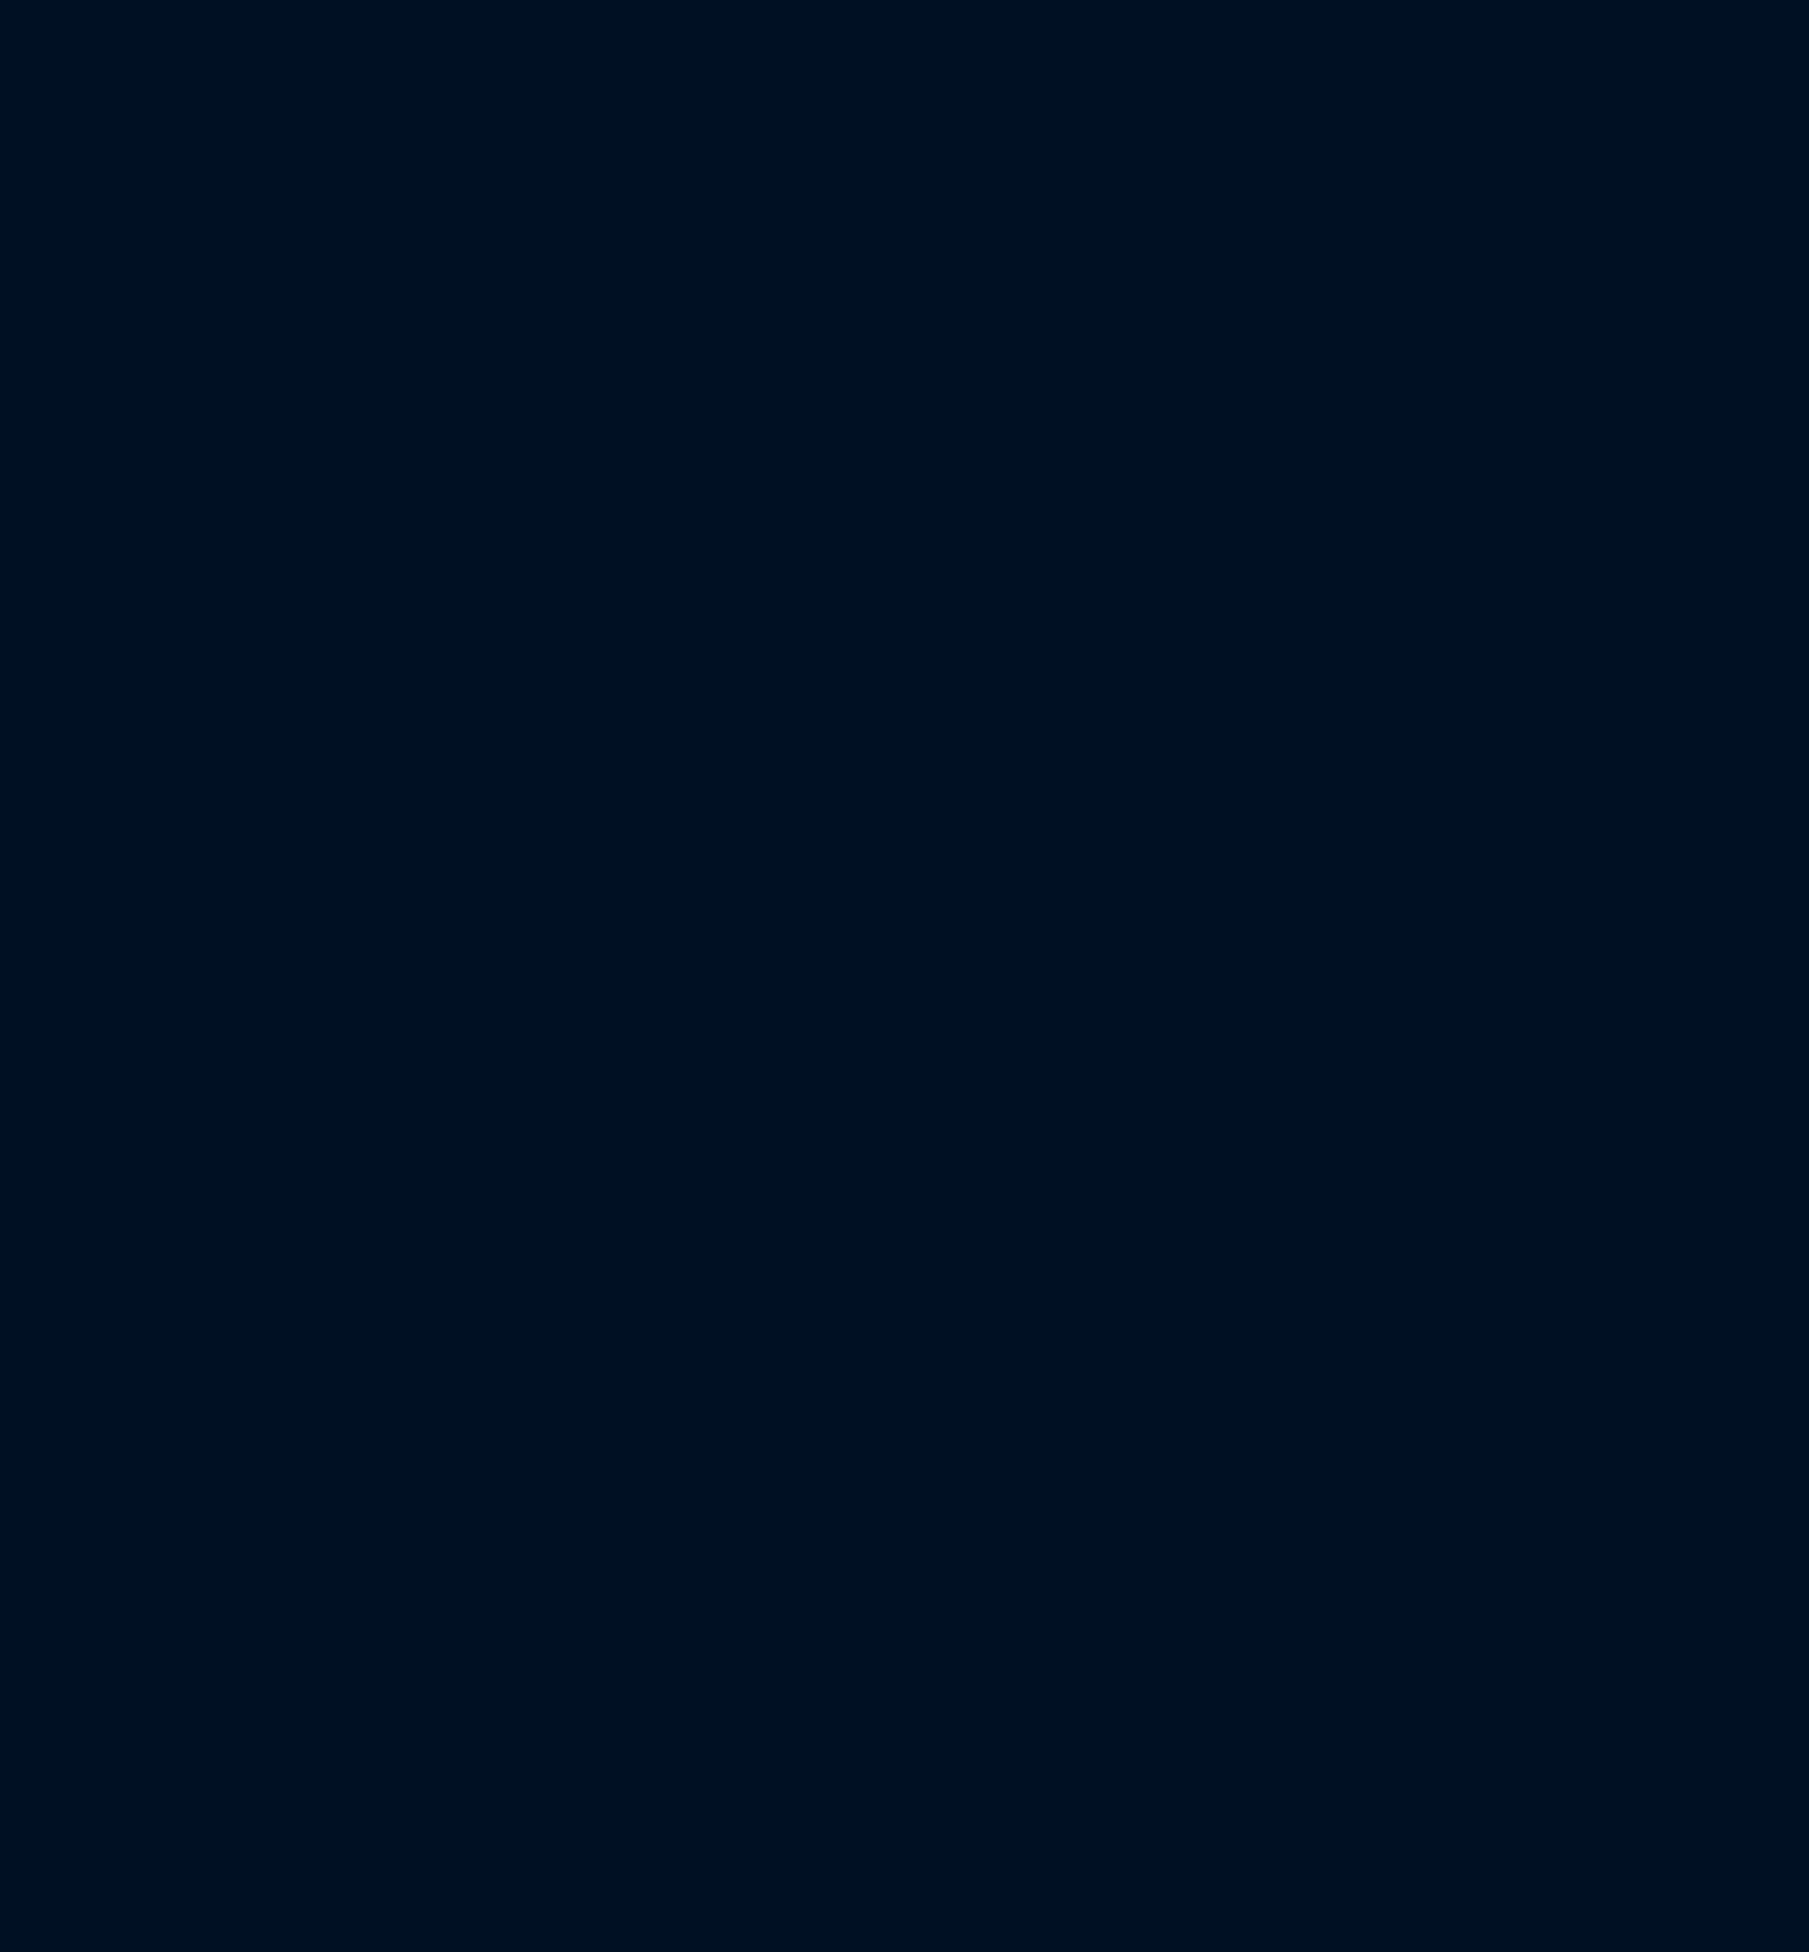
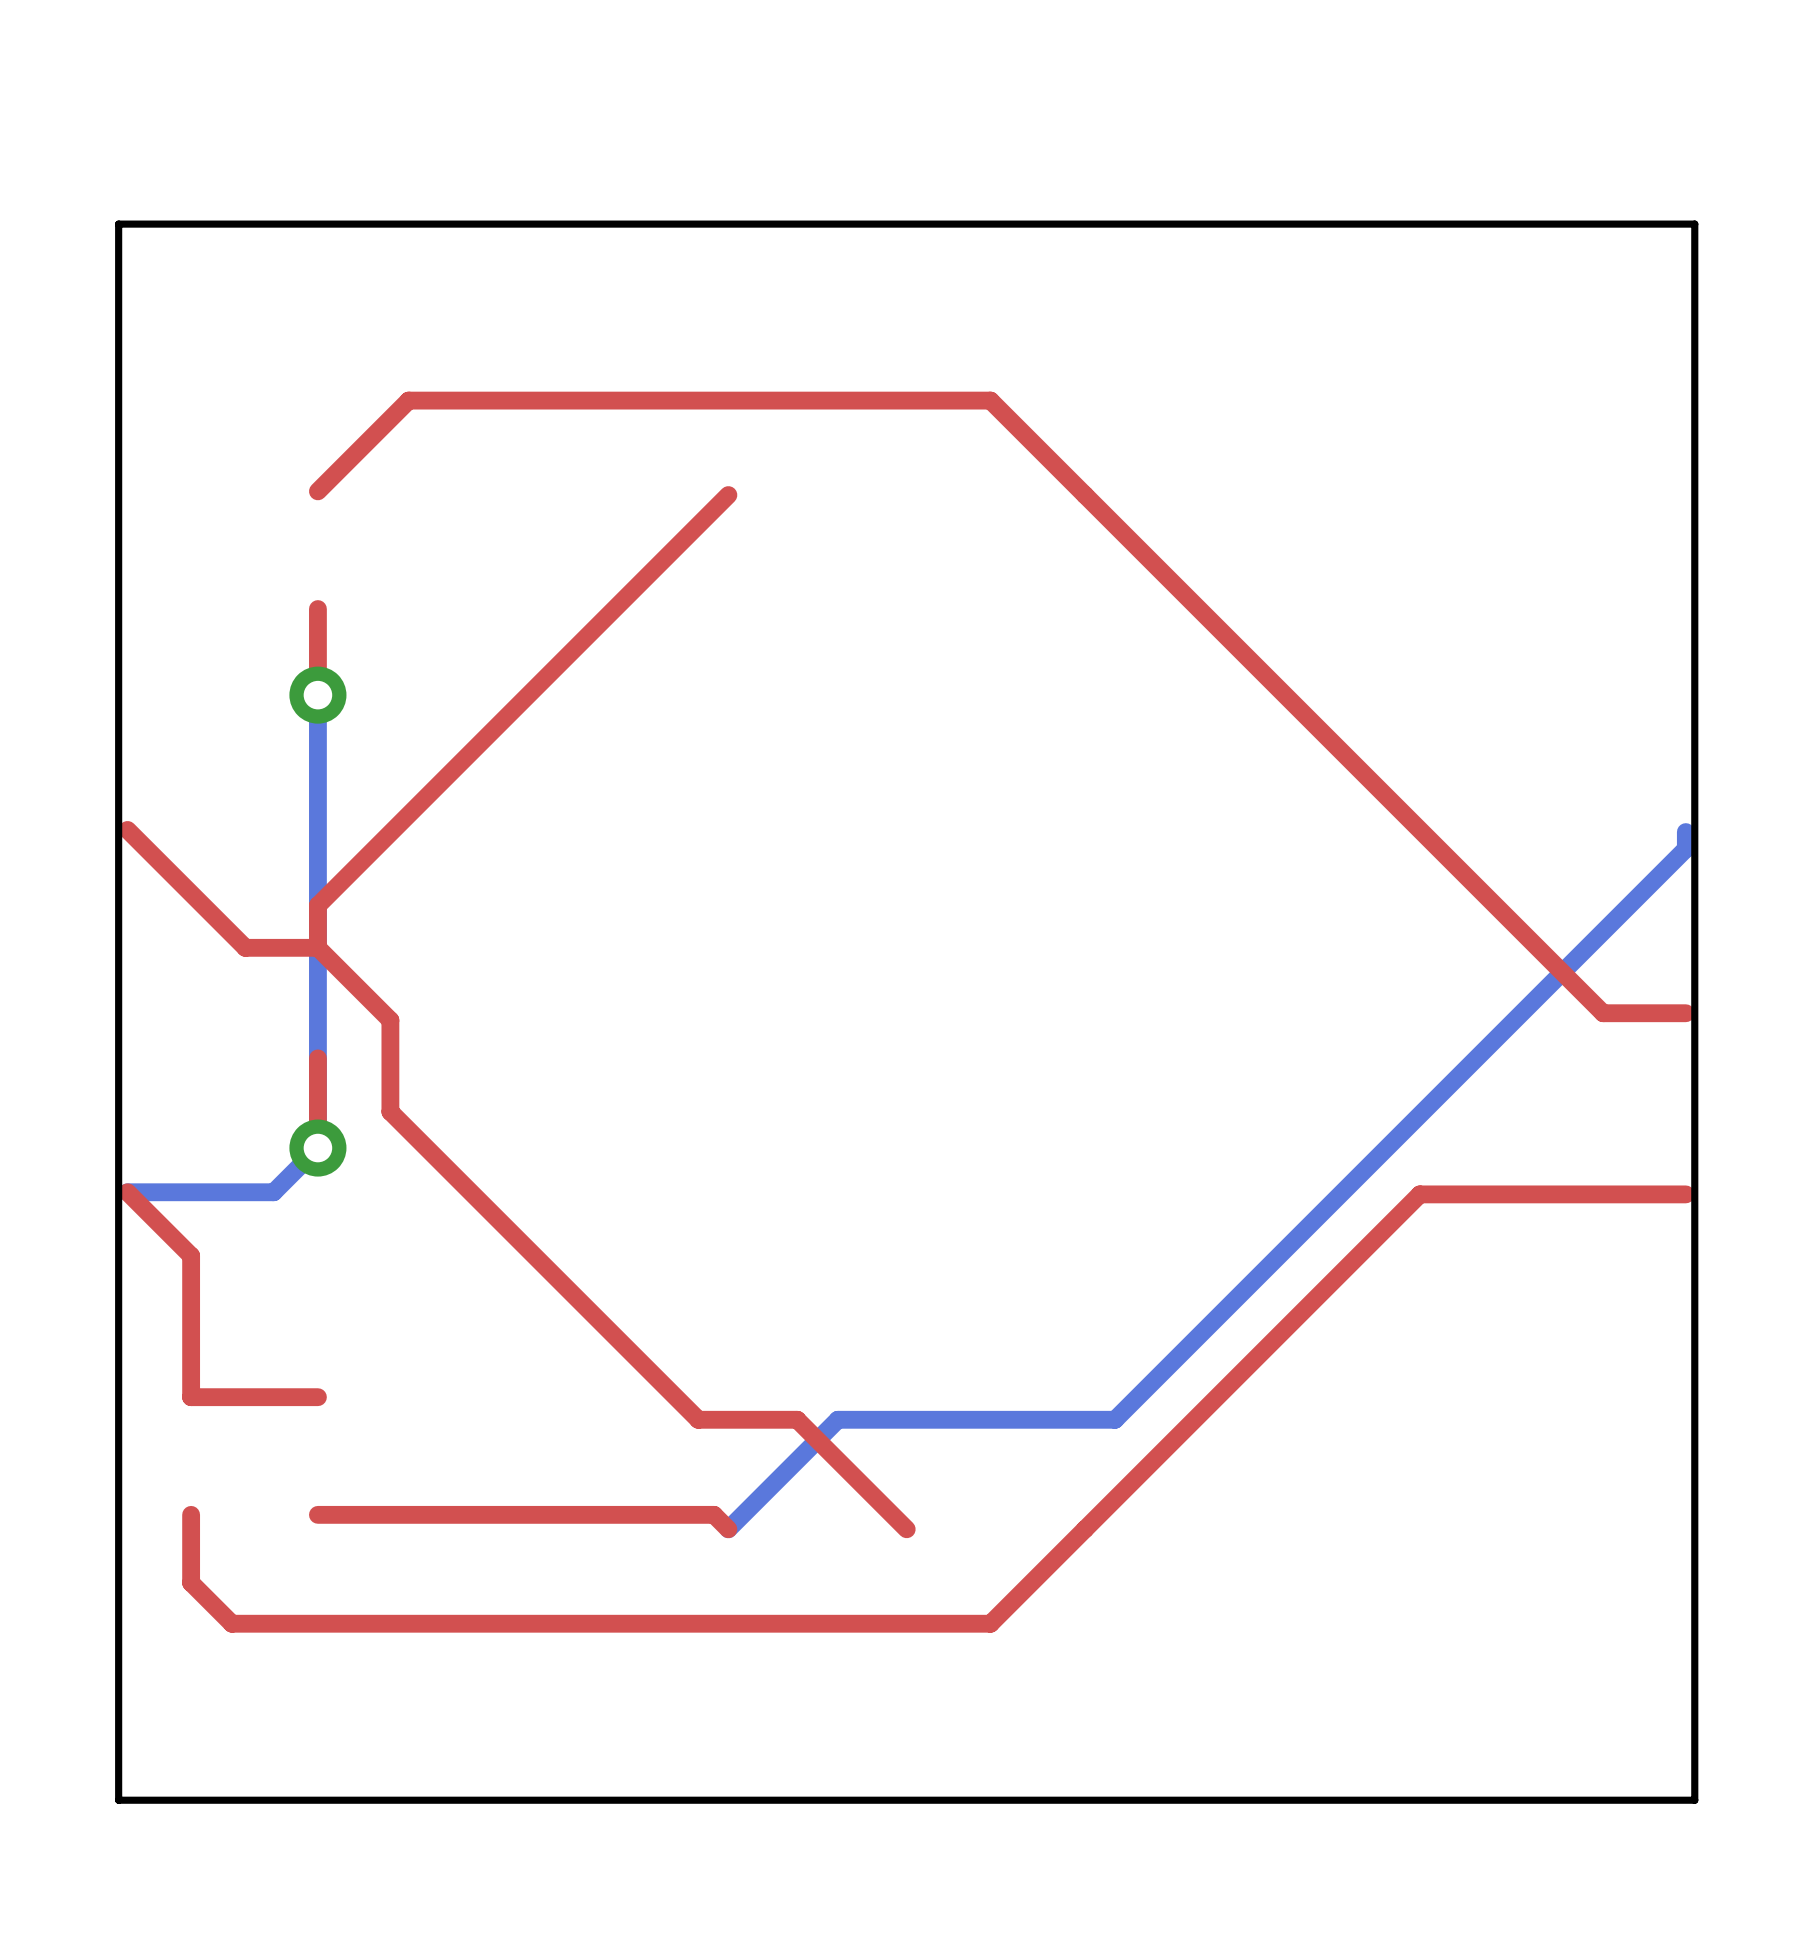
board edge: none -> (118, 224) (118, 1800) (1694, 1800) (1694, 224) (118, 224)
top track: none -> (317, 491) (408, 400) (990, 400) (1603, 1013) (1685, 1013)
top track: none -> (728, 495) (317, 905) (317, 947)
top track: none -> (317, 609) (317, 695)
bottom track: none -> (317, 695) (317, 1148) (273, 1192) (127, 1192)
via: none -> (317, 695)
top track: none -> (127, 829) (245, 947) (317, 947)
bottom track: none -> (1685, 832) (1685, 848) (1115, 1419) (837, 1419) (728, 1529)
top track: none -> (317, 947) (390, 1020) (390, 1111) (698, 1419) (797, 1419) (906, 1529)
top track: none -> (317, 1058) (317, 1148)
via: none -> (317, 1148)
top track: none -> (127, 1192) (191, 1255) (191, 1397) (317, 1397)
top track: none -> (1685, 1194) (1419, 1194) (990, 1623) (232, 1623) (191, 1582) (191, 1514)
top track: none -> (317, 1514) (713, 1514) (728, 1529)

